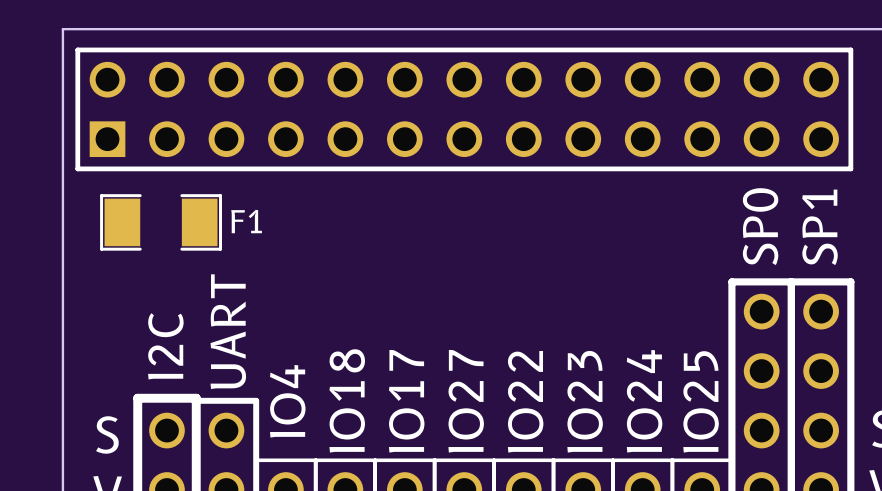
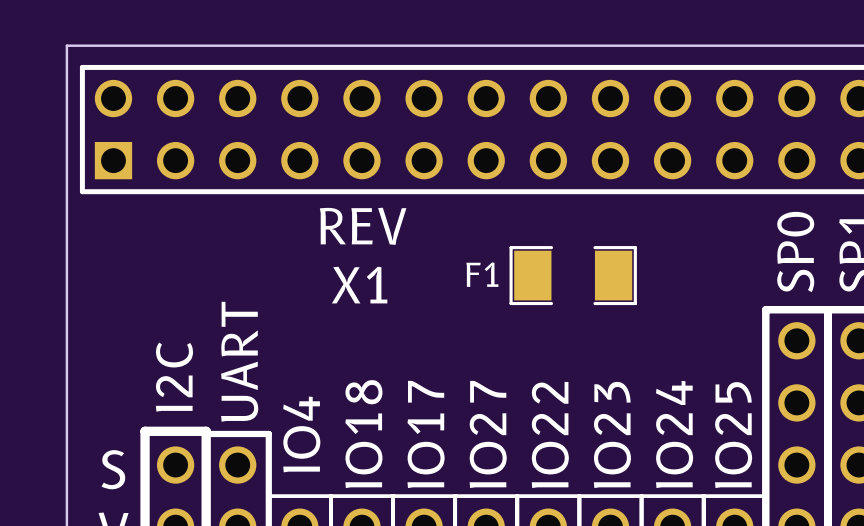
text: none -> REV (363, 226)
F1 name position: F1 (246, 221) -> F1 (482, 274)
F1 position: (161, 222) -> (573, 275)
text: none -> X1 (359, 285)

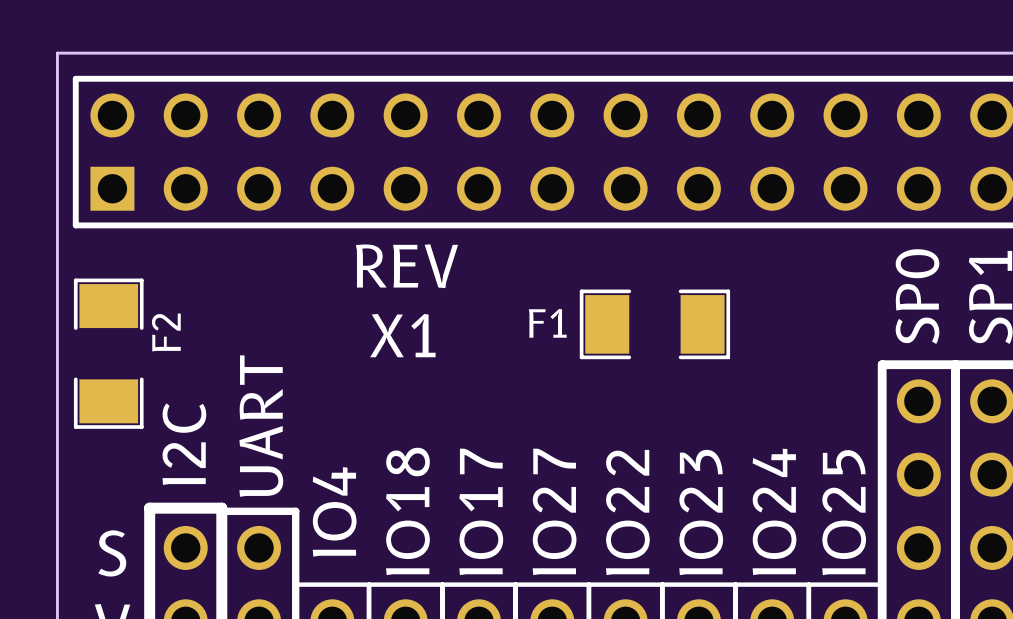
F2: none -> (108, 353)

